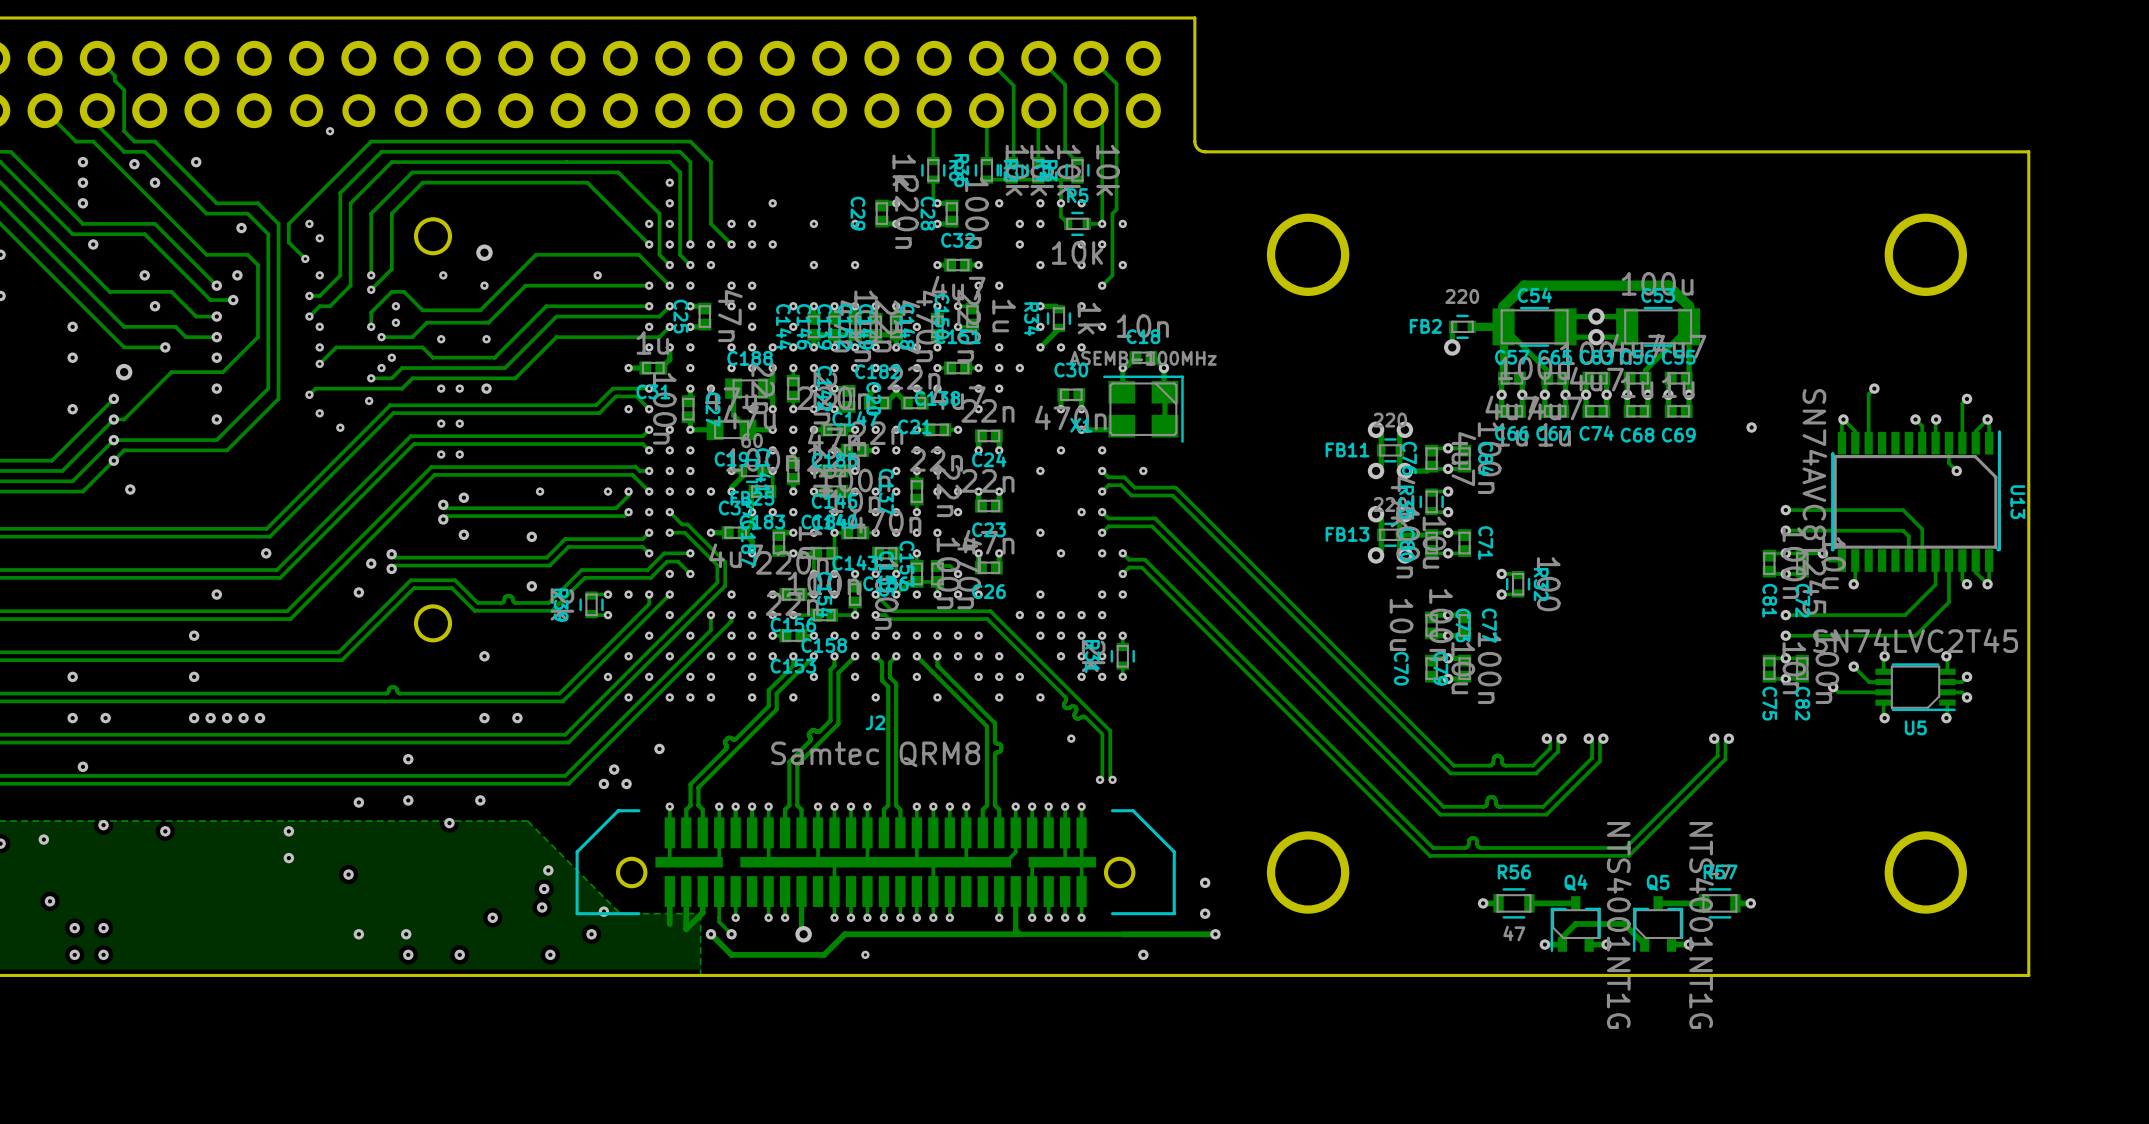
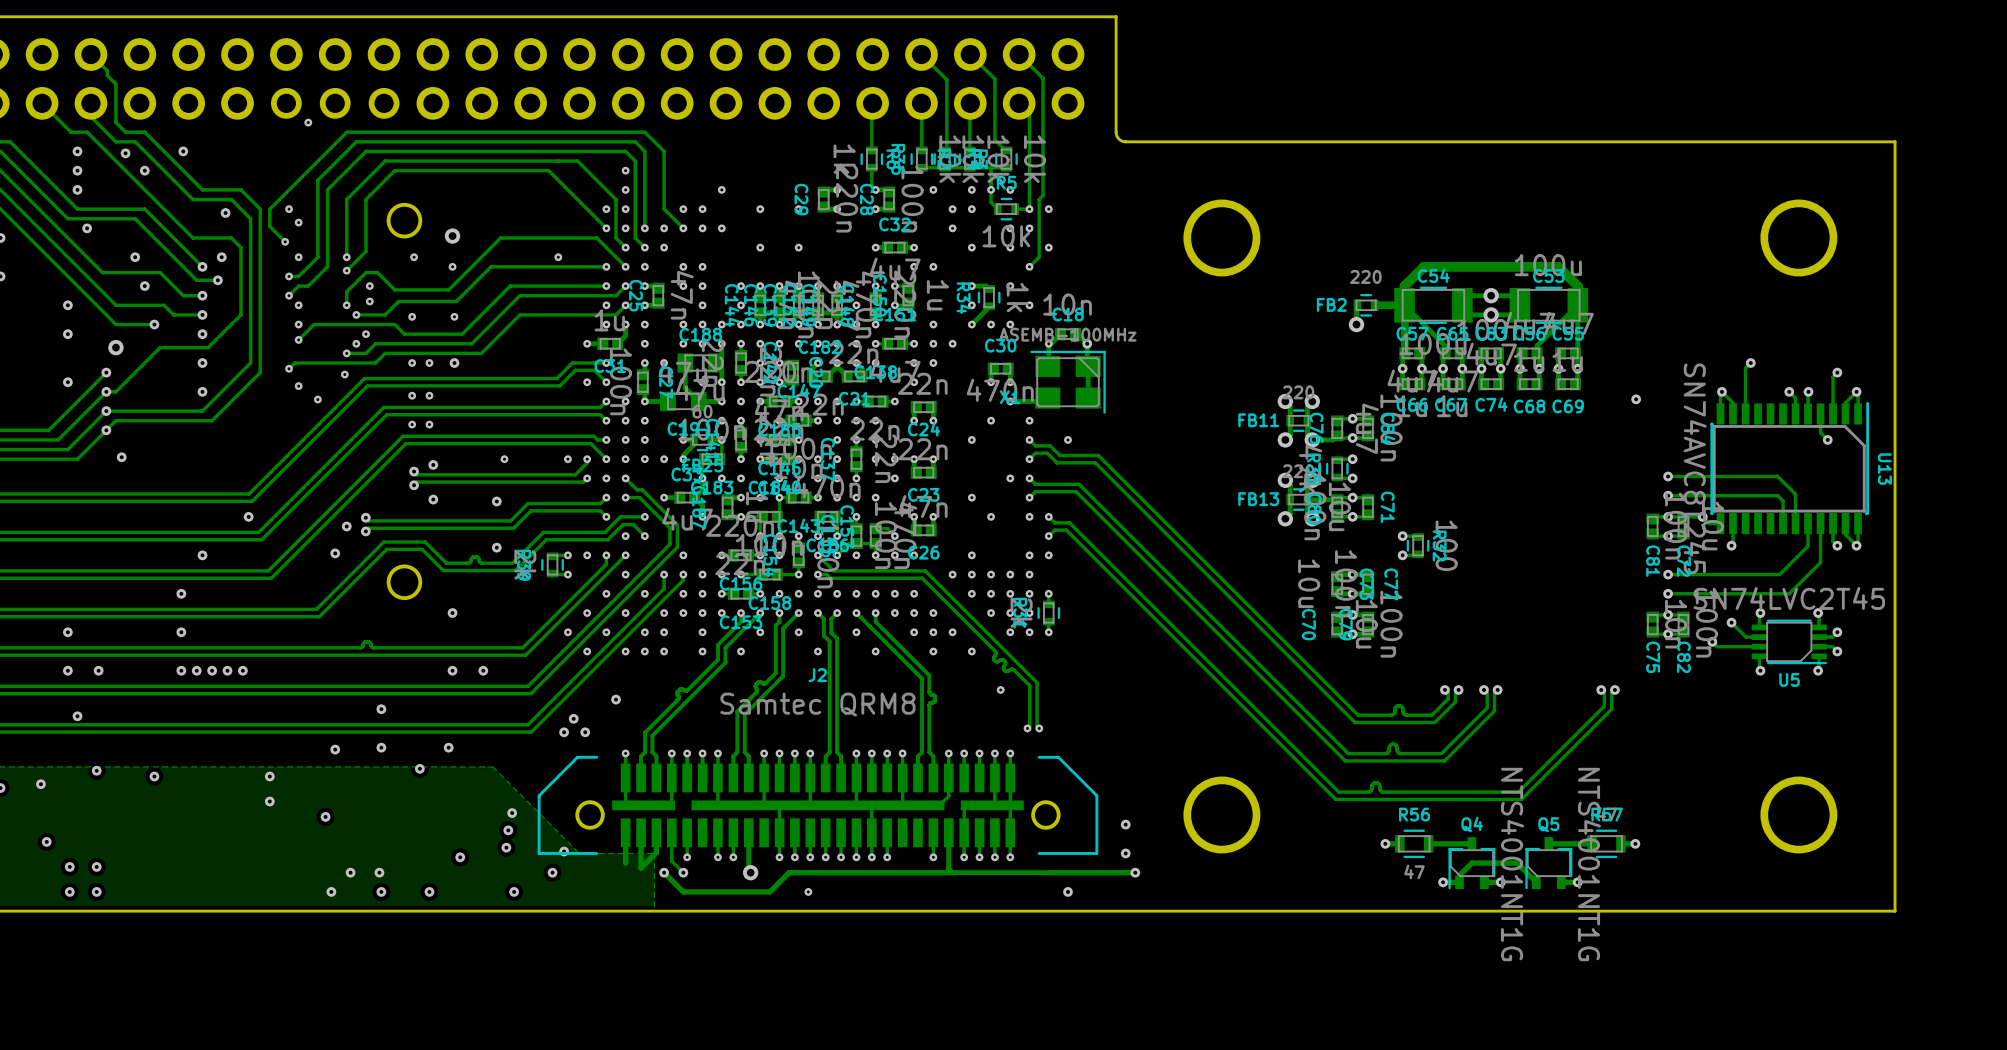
via: (358, 934) -> none
via: none -> (350, 872)
via: none -> (331, 891)

